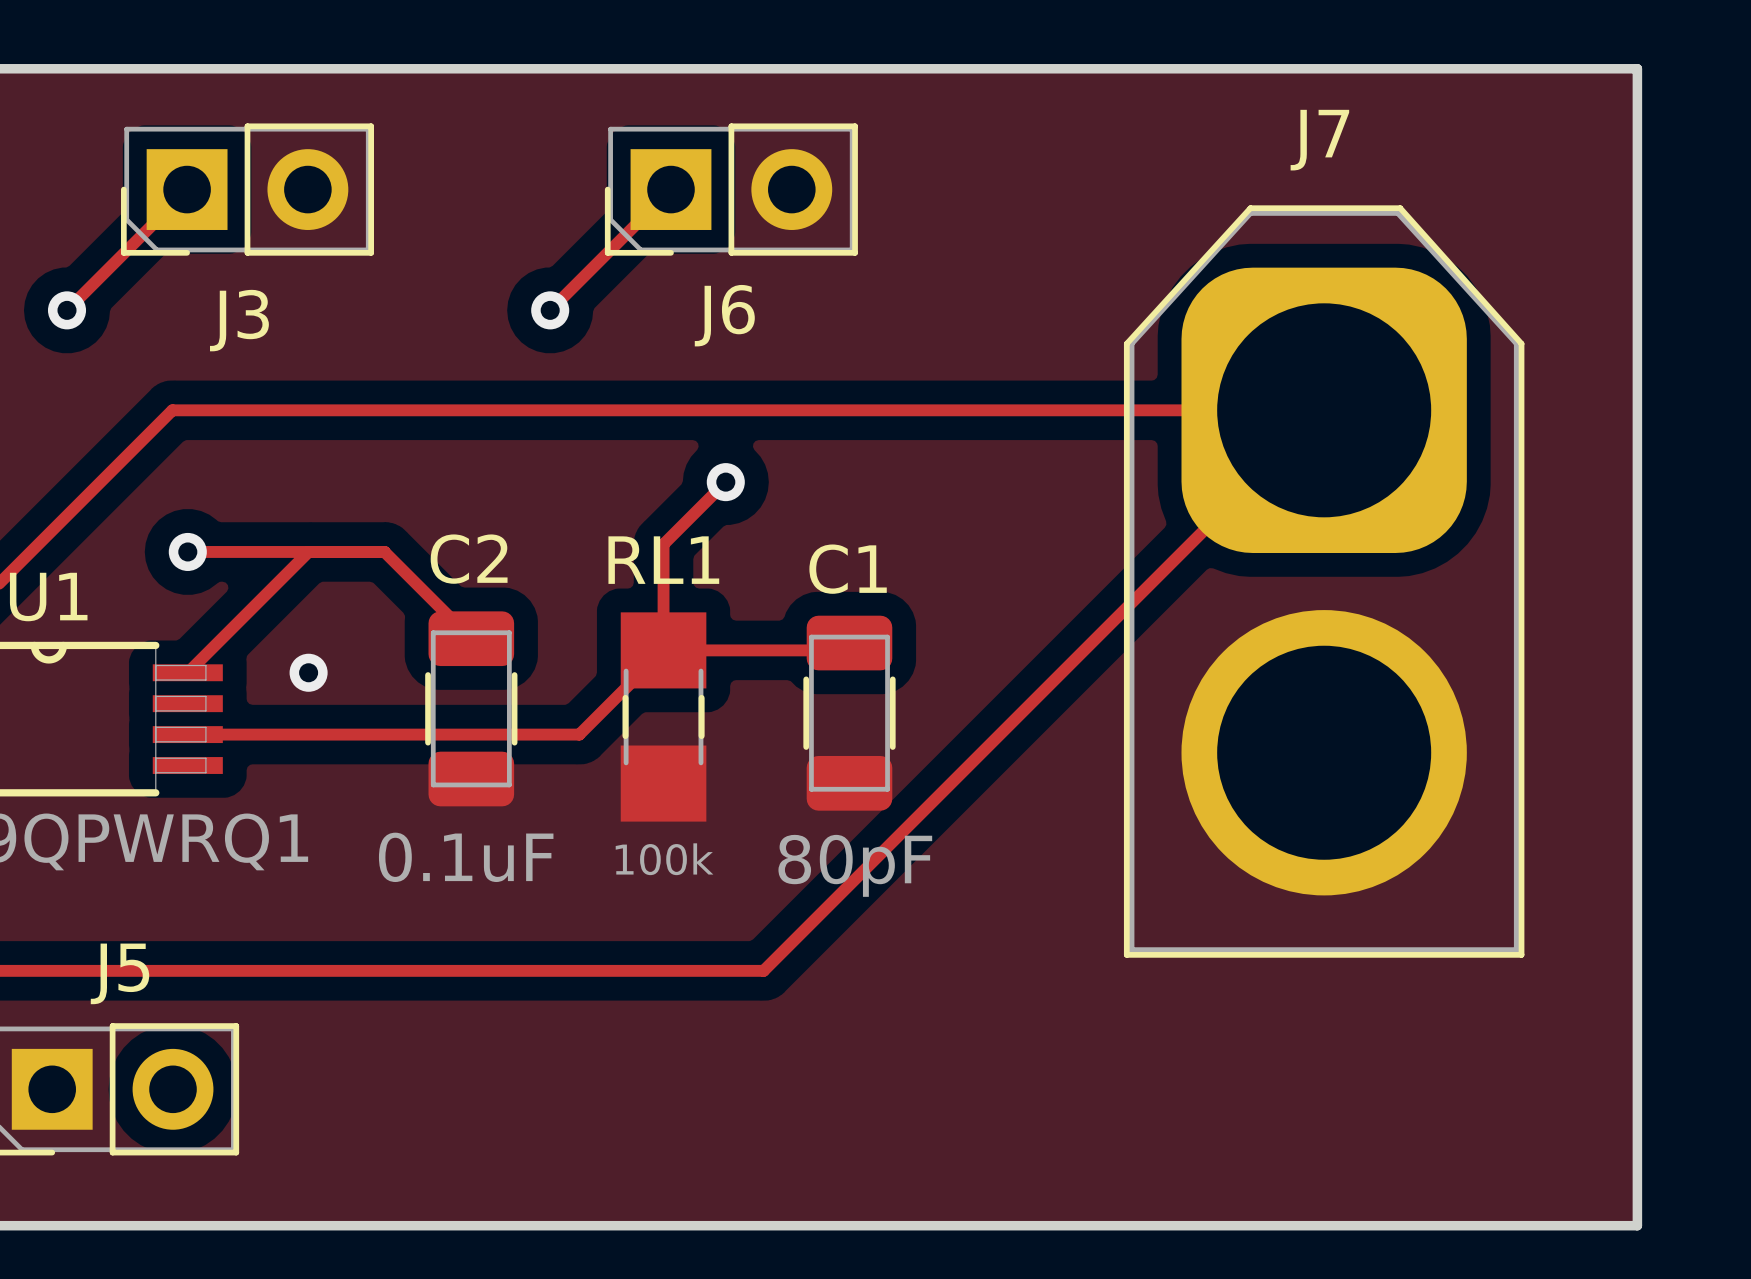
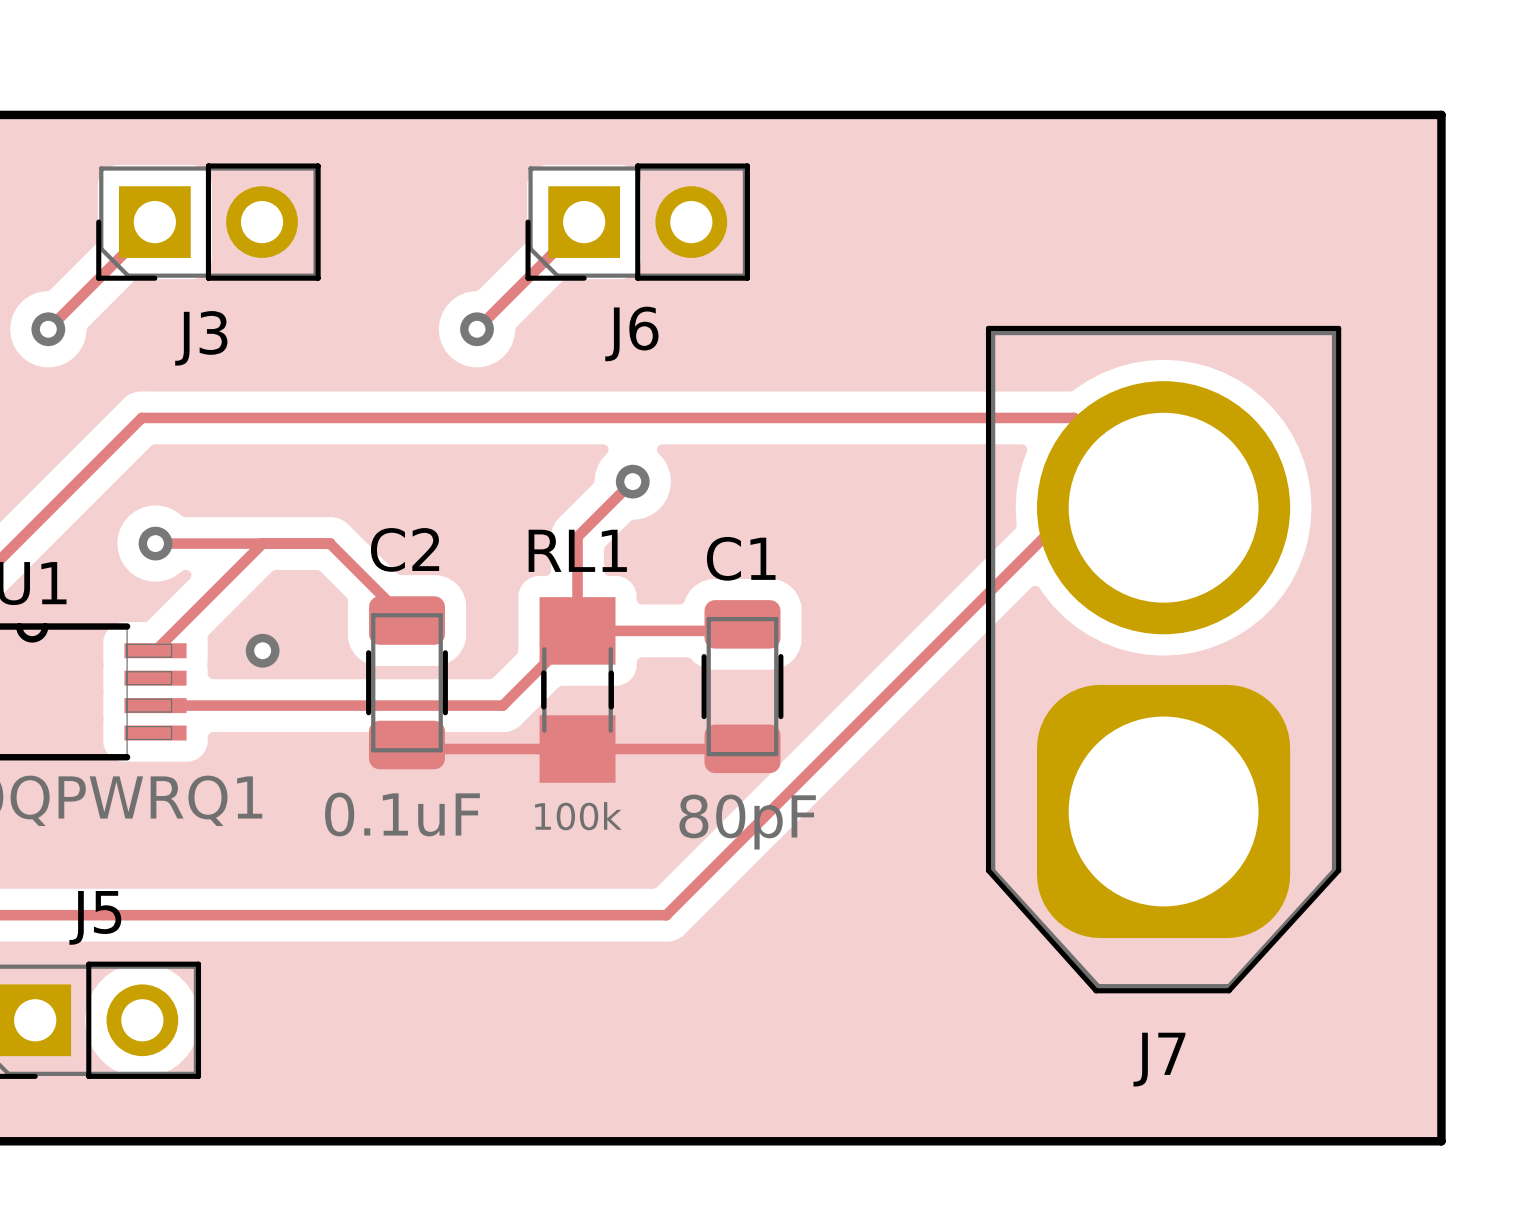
J7 rotation: 0° (1324, 581) -> 180° (1163, 659)
track: none -> (407, 744) (411, 749) (742, 749)

